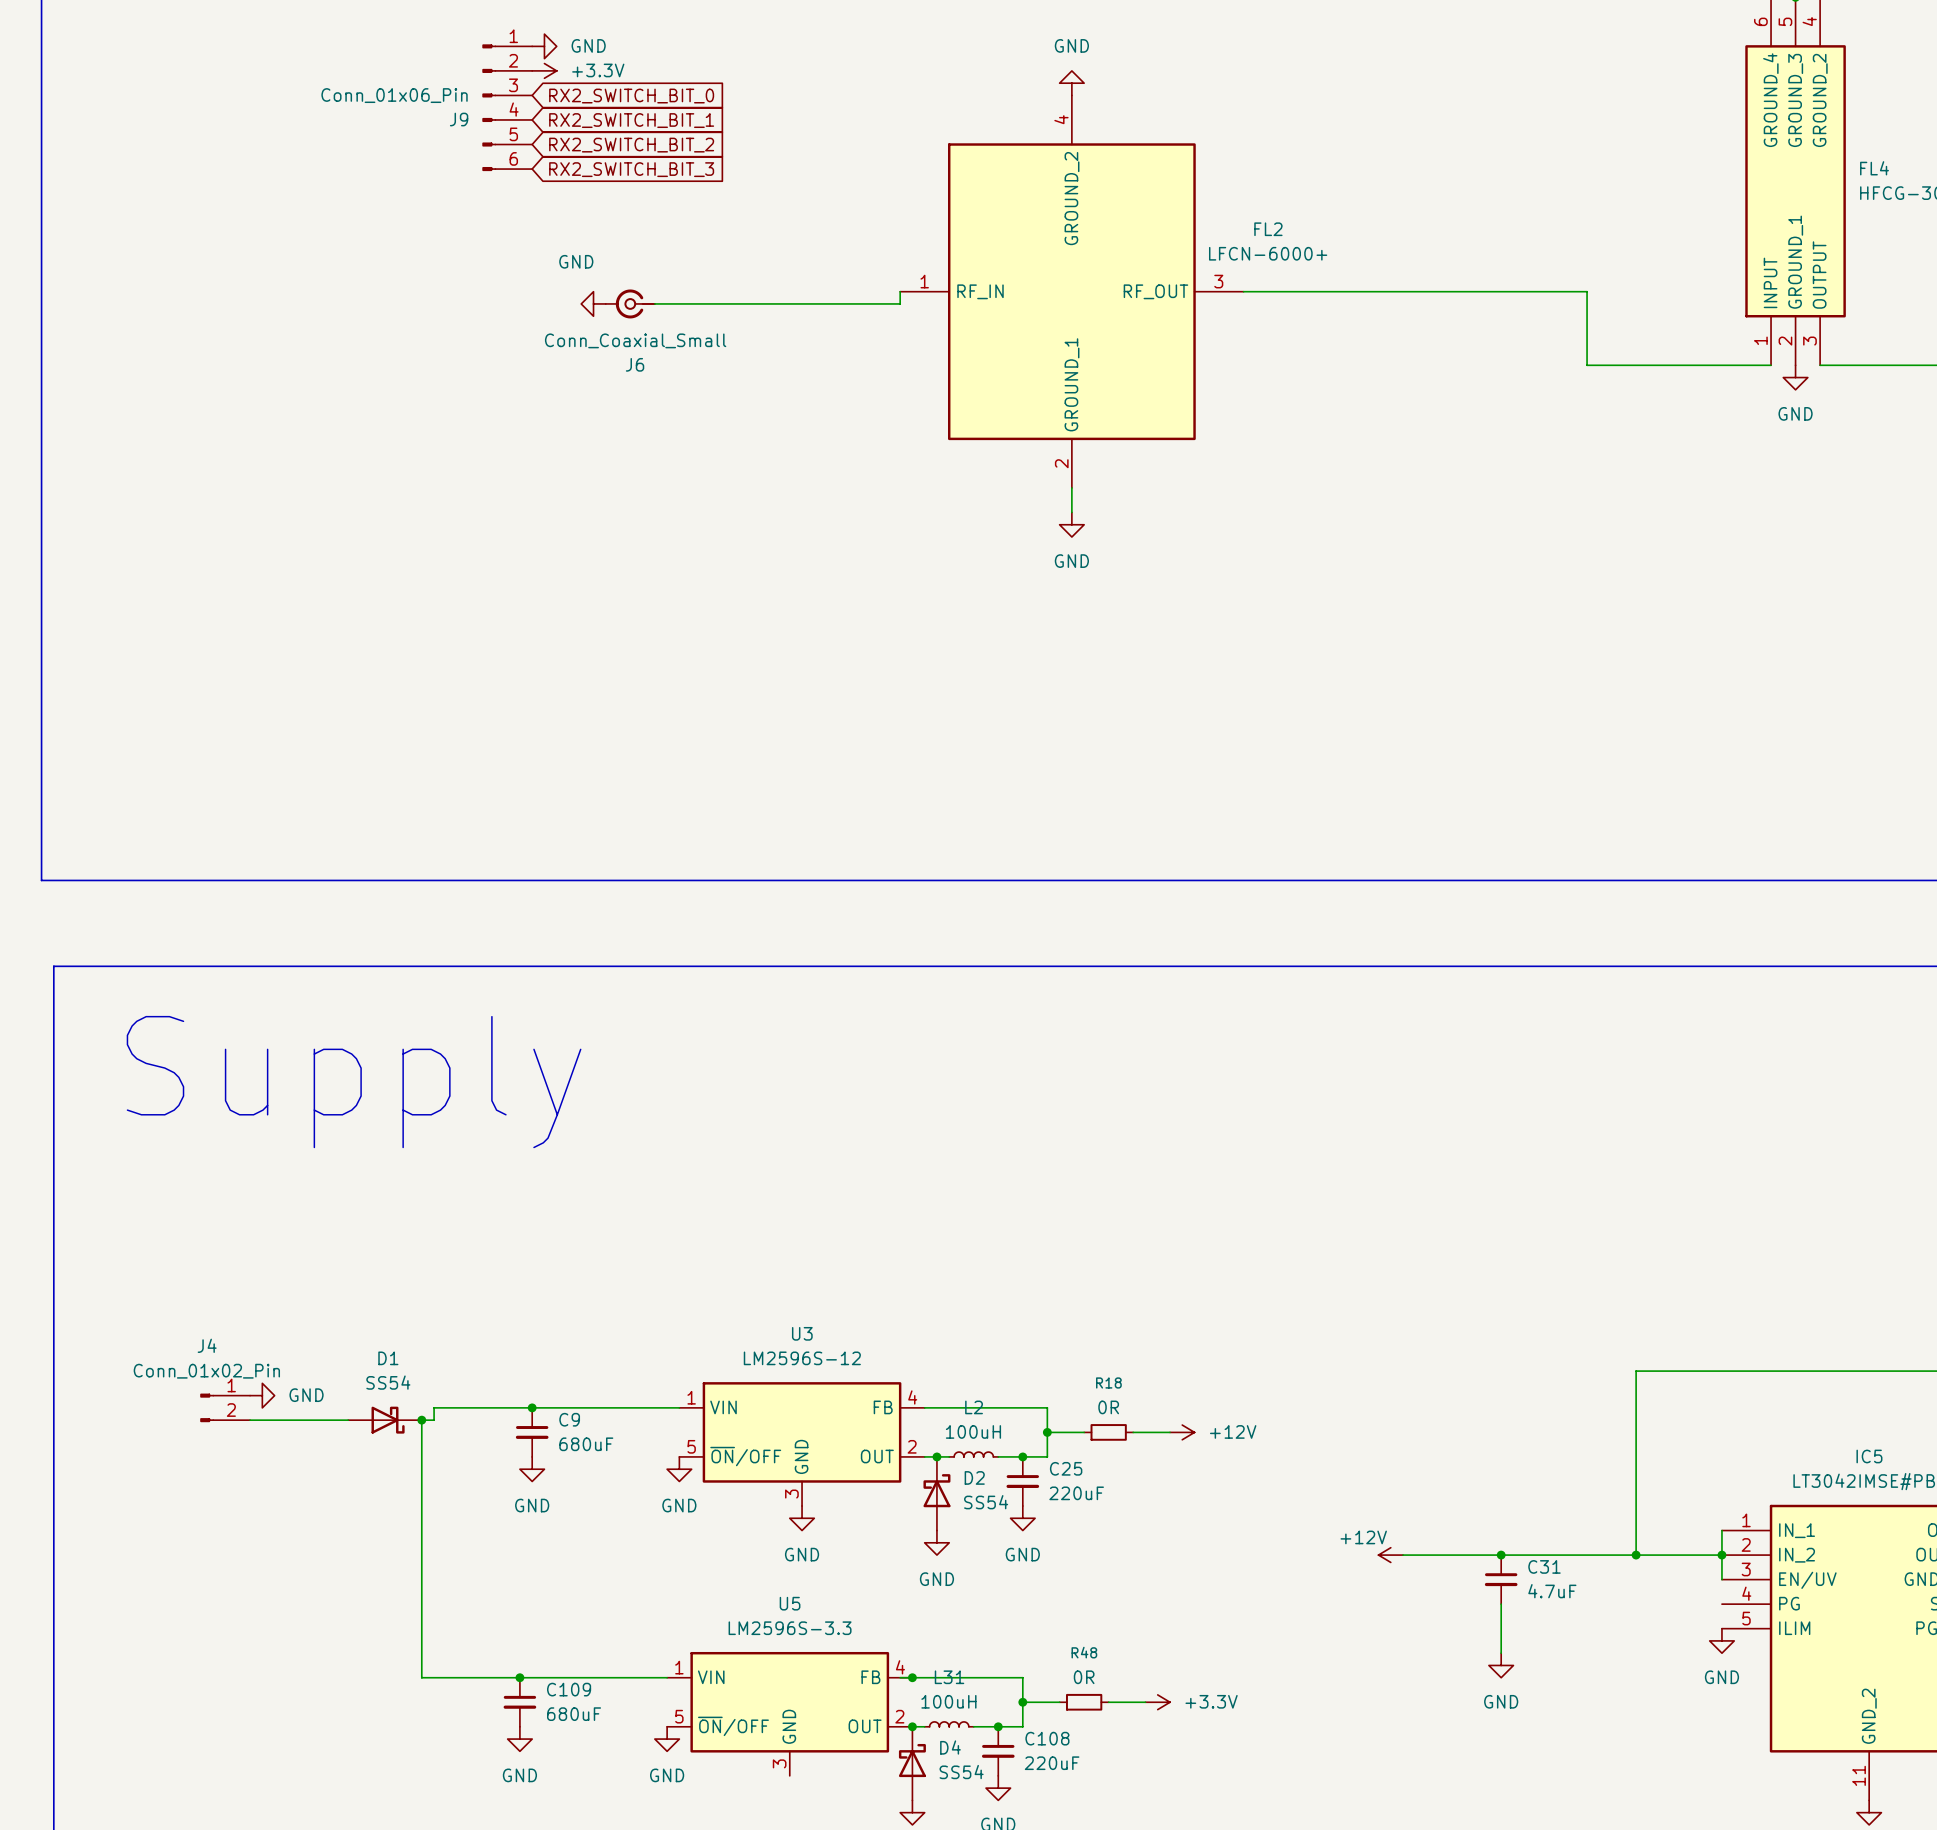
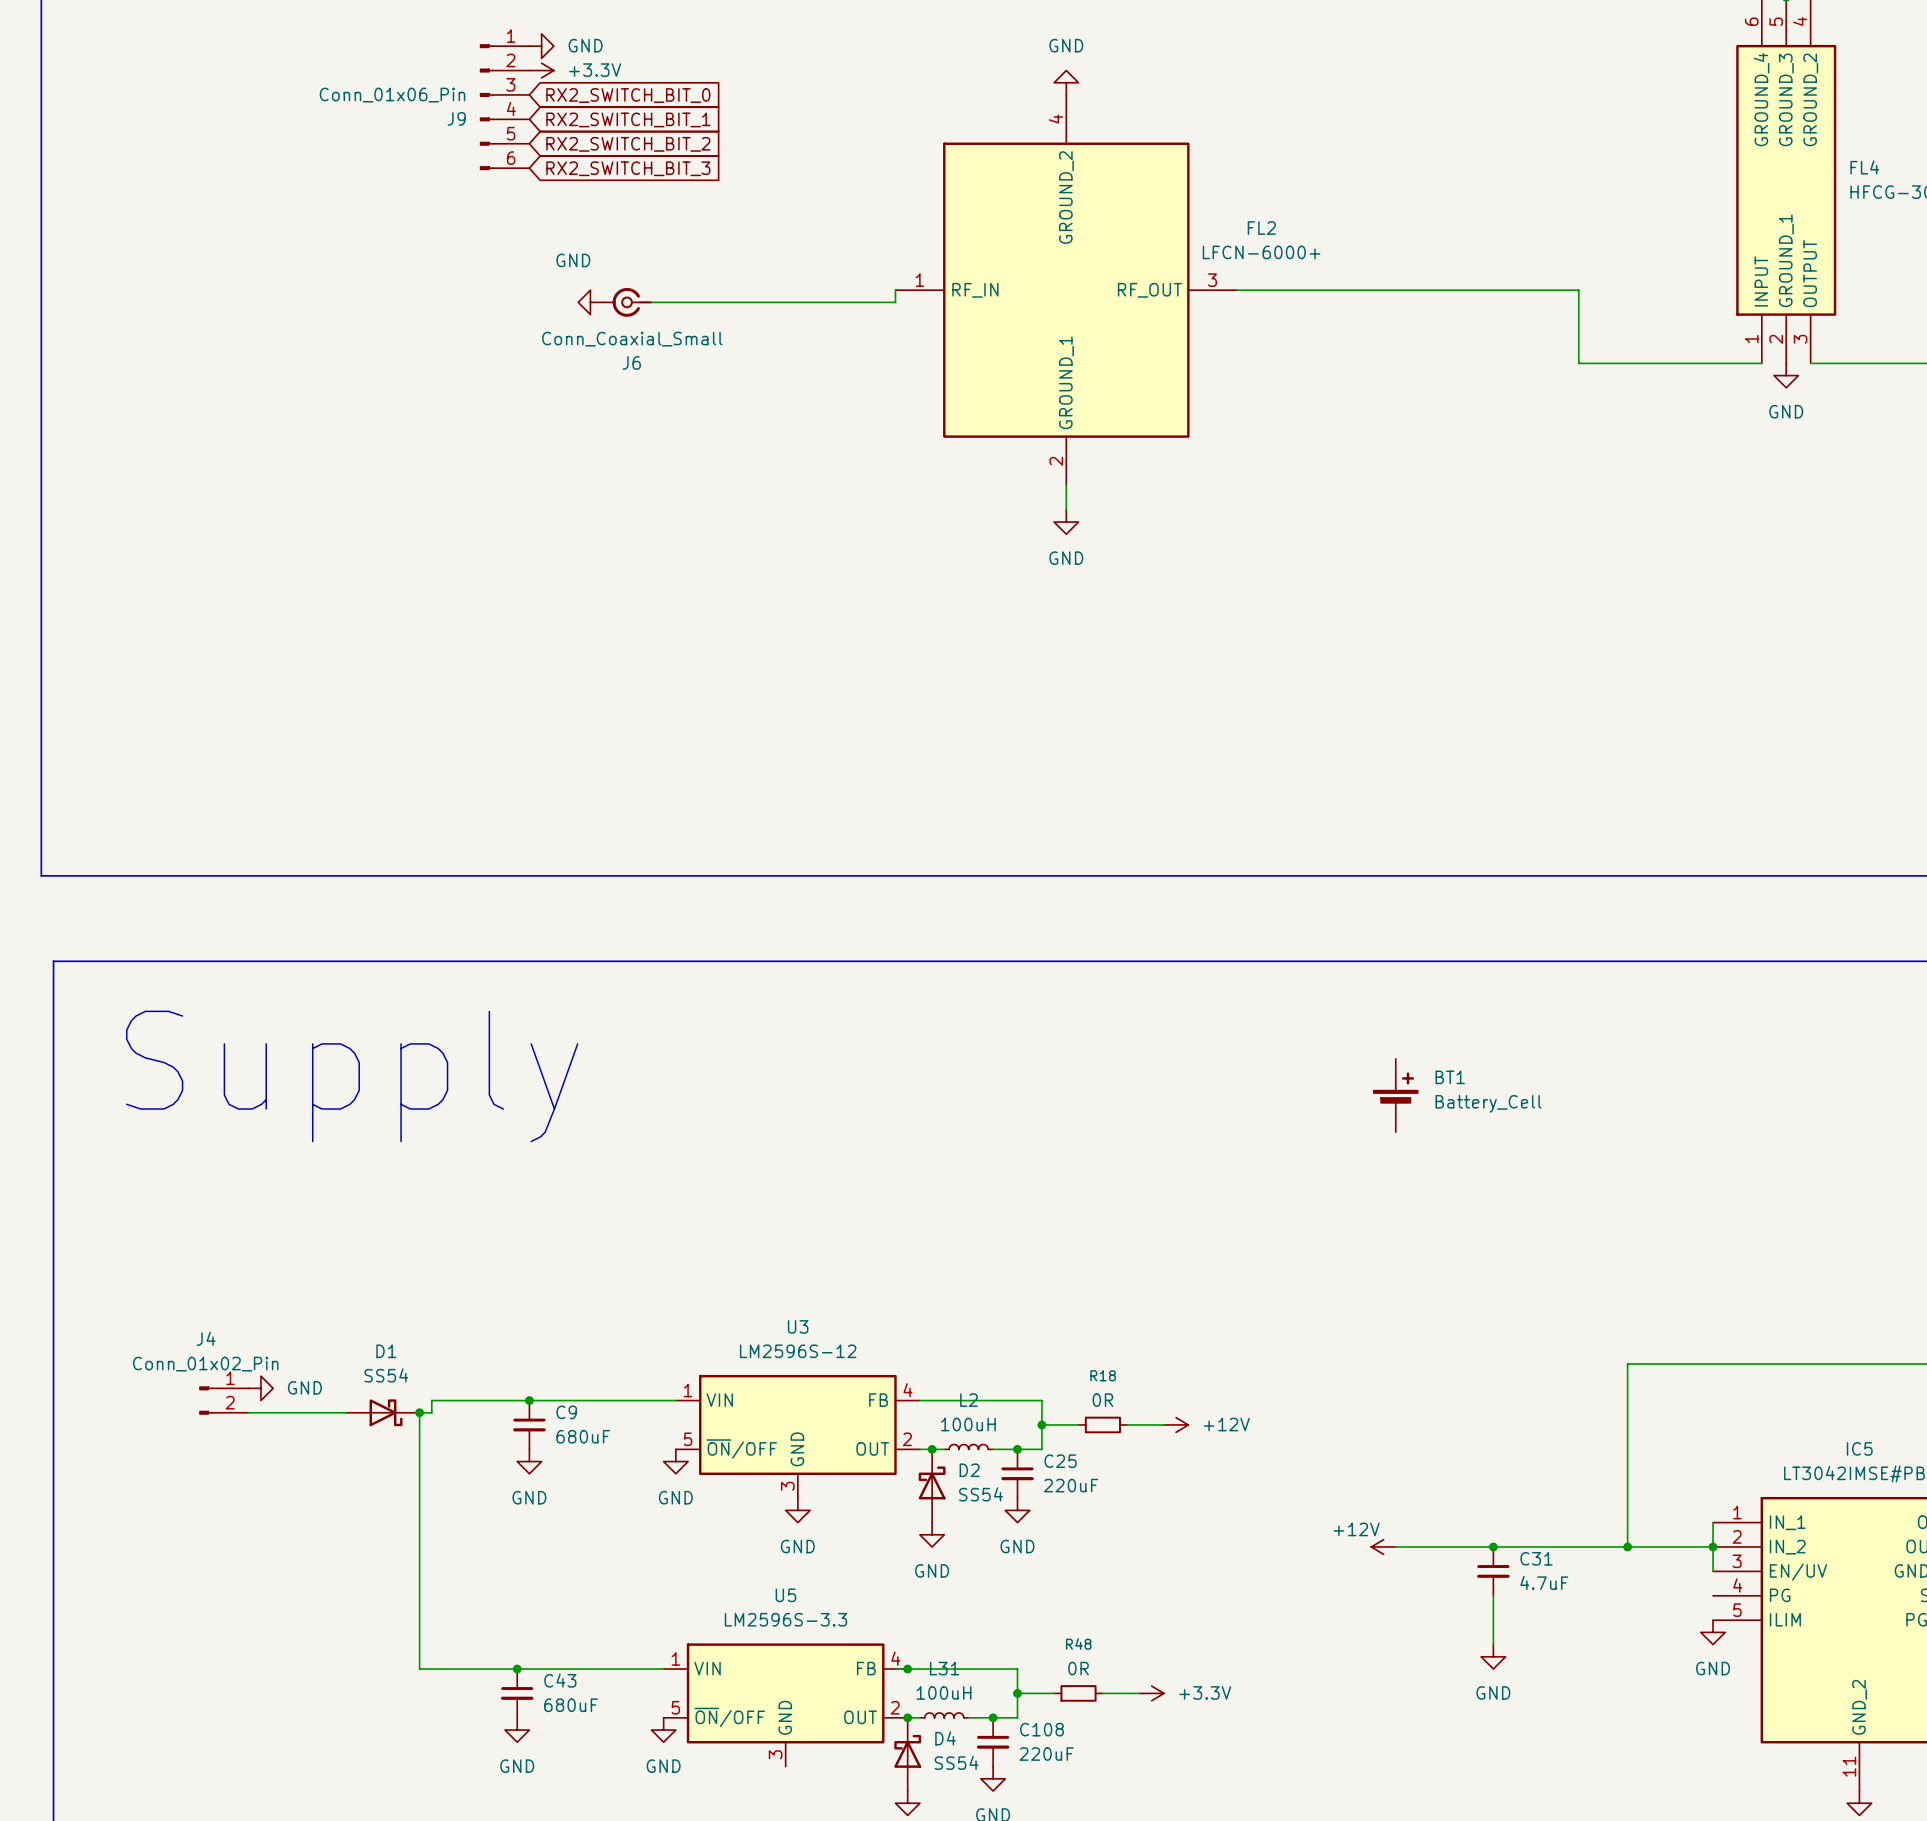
BT1: none -> Battery_Cell (1395, 1095)
C109 name: C109 (569, 1689) -> C43 (560, 1680)

